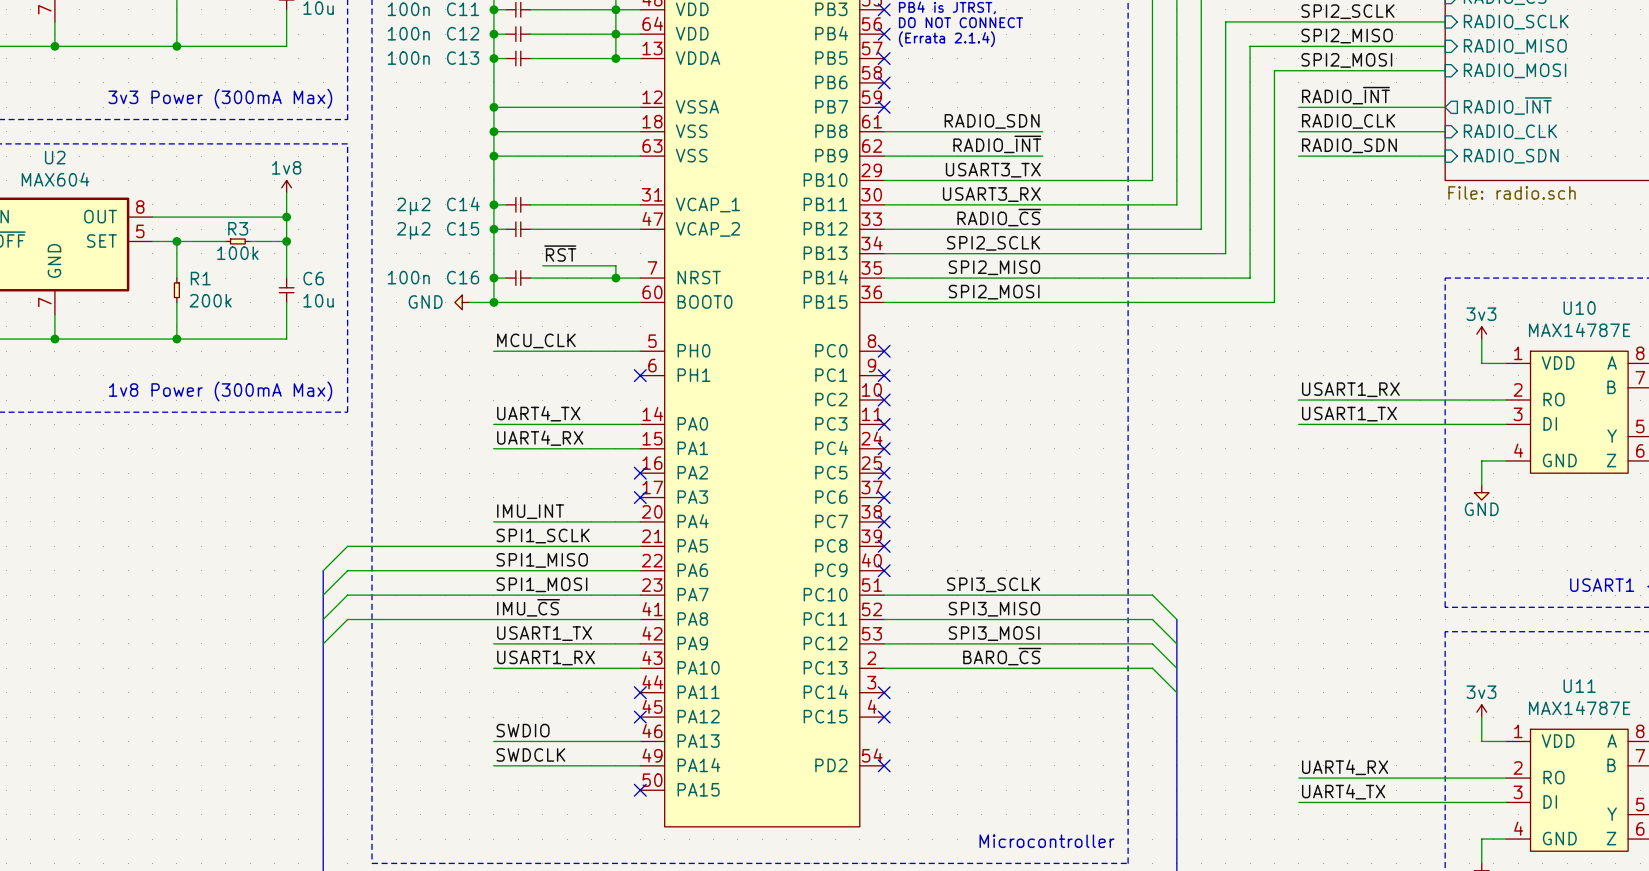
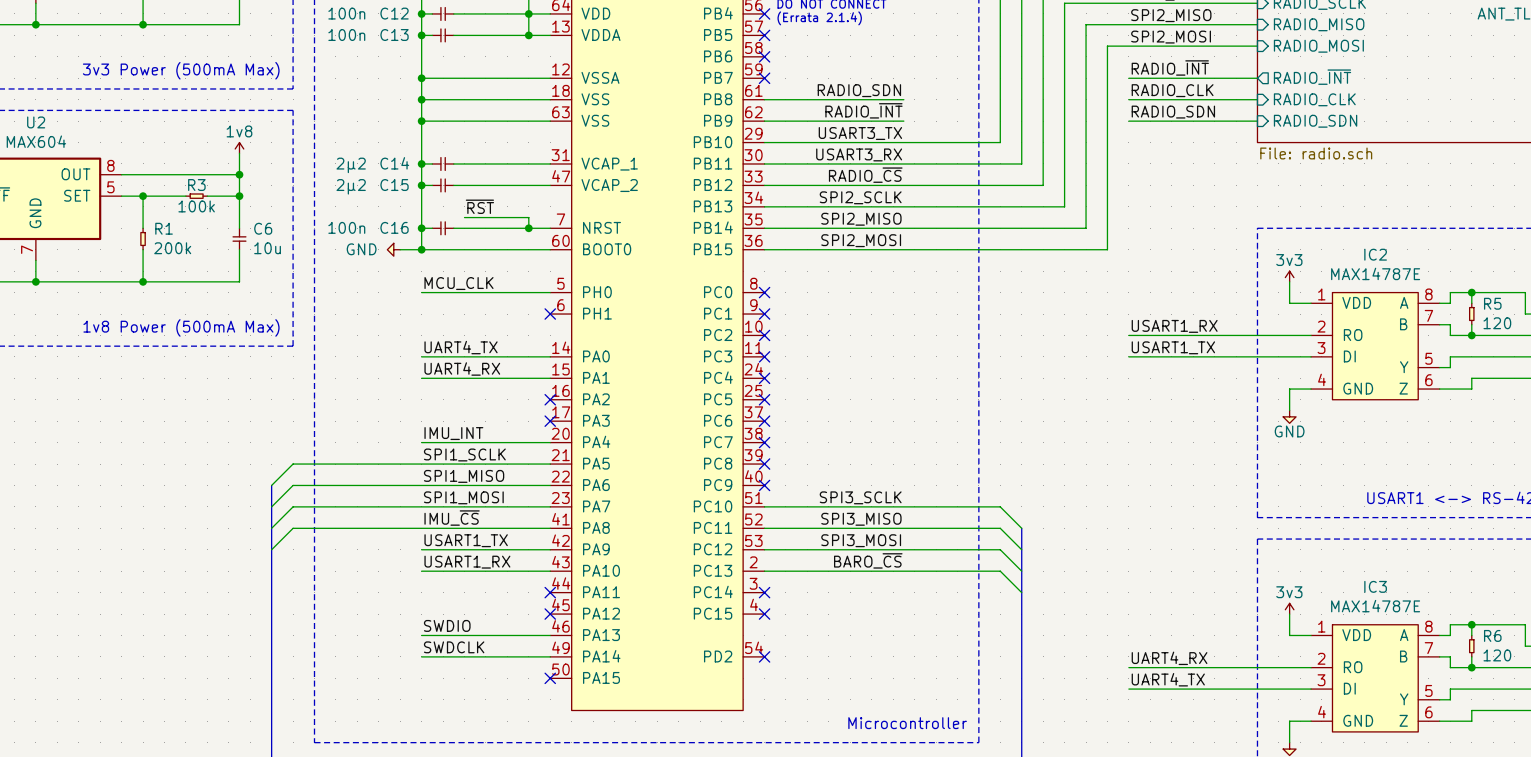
text: 3v3 Power (300mA Max) (220, 98) -> 3v3 Power (500mA Max) (181, 70)
U10 name: U10 (1579, 308) -> IC2 (1375, 254)
text: 1v8 Power (300mA Max) (220, 391) -> 1v8 Power (500mA Max) (181, 327)
U11 name: U11 (1579, 686) -> IC3 (1375, 586)

